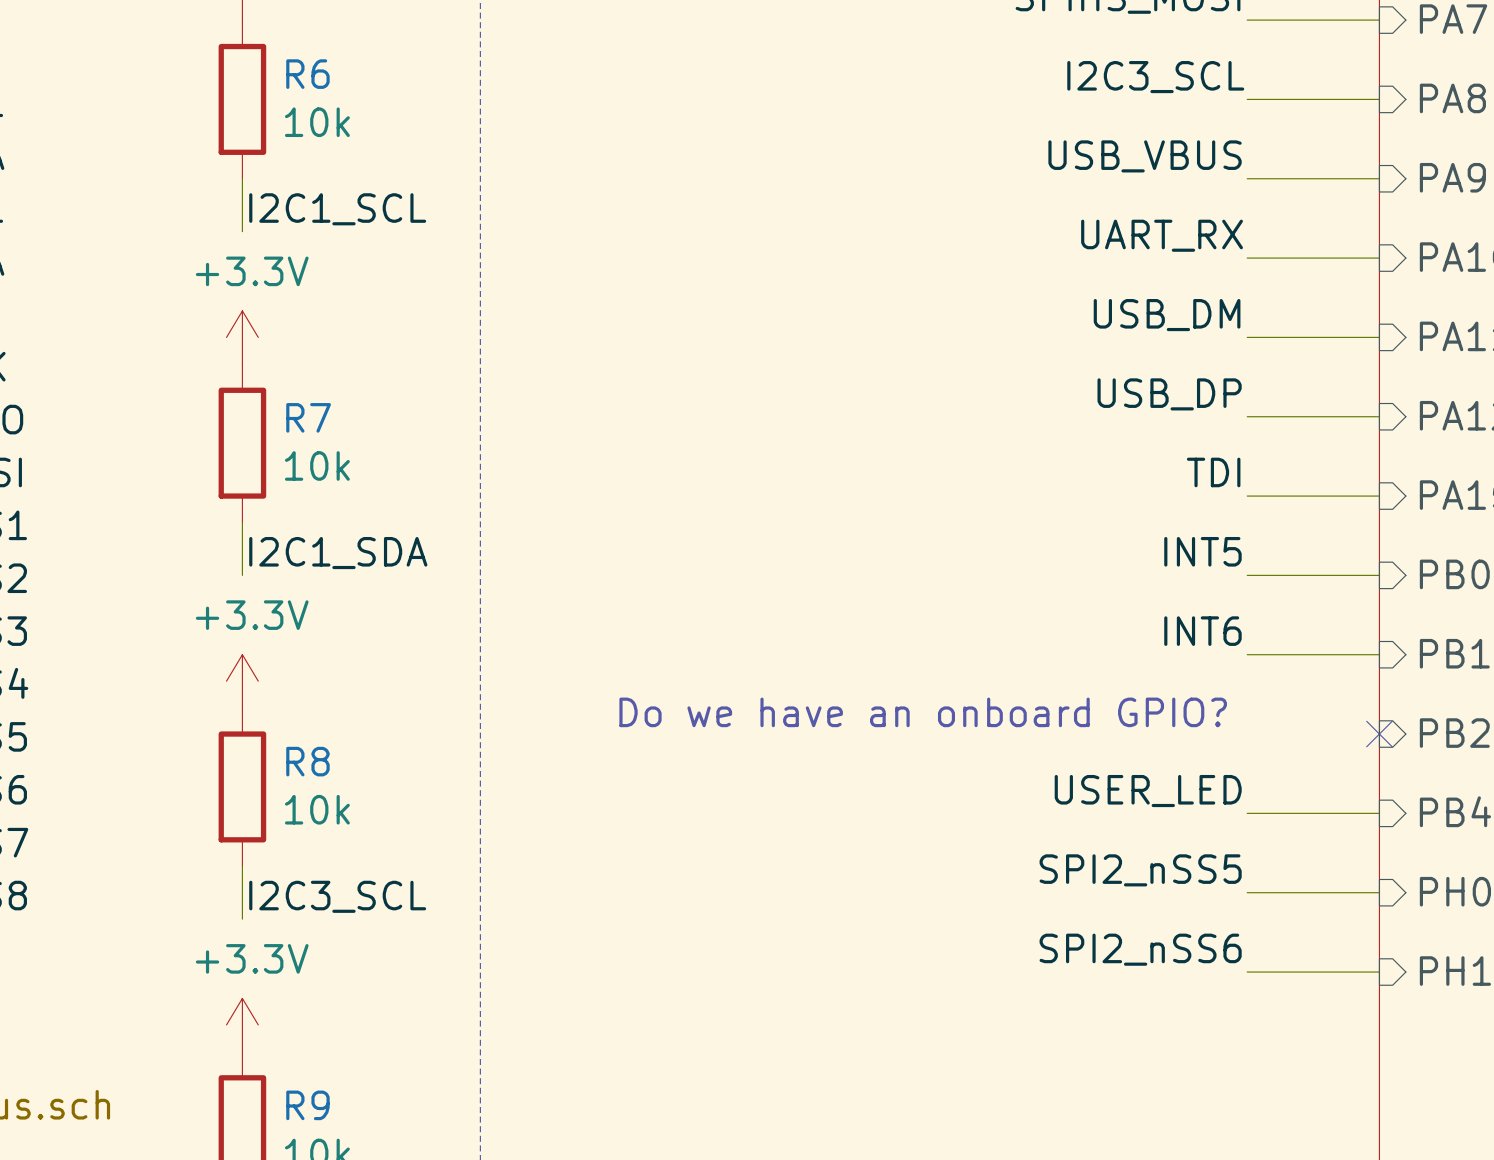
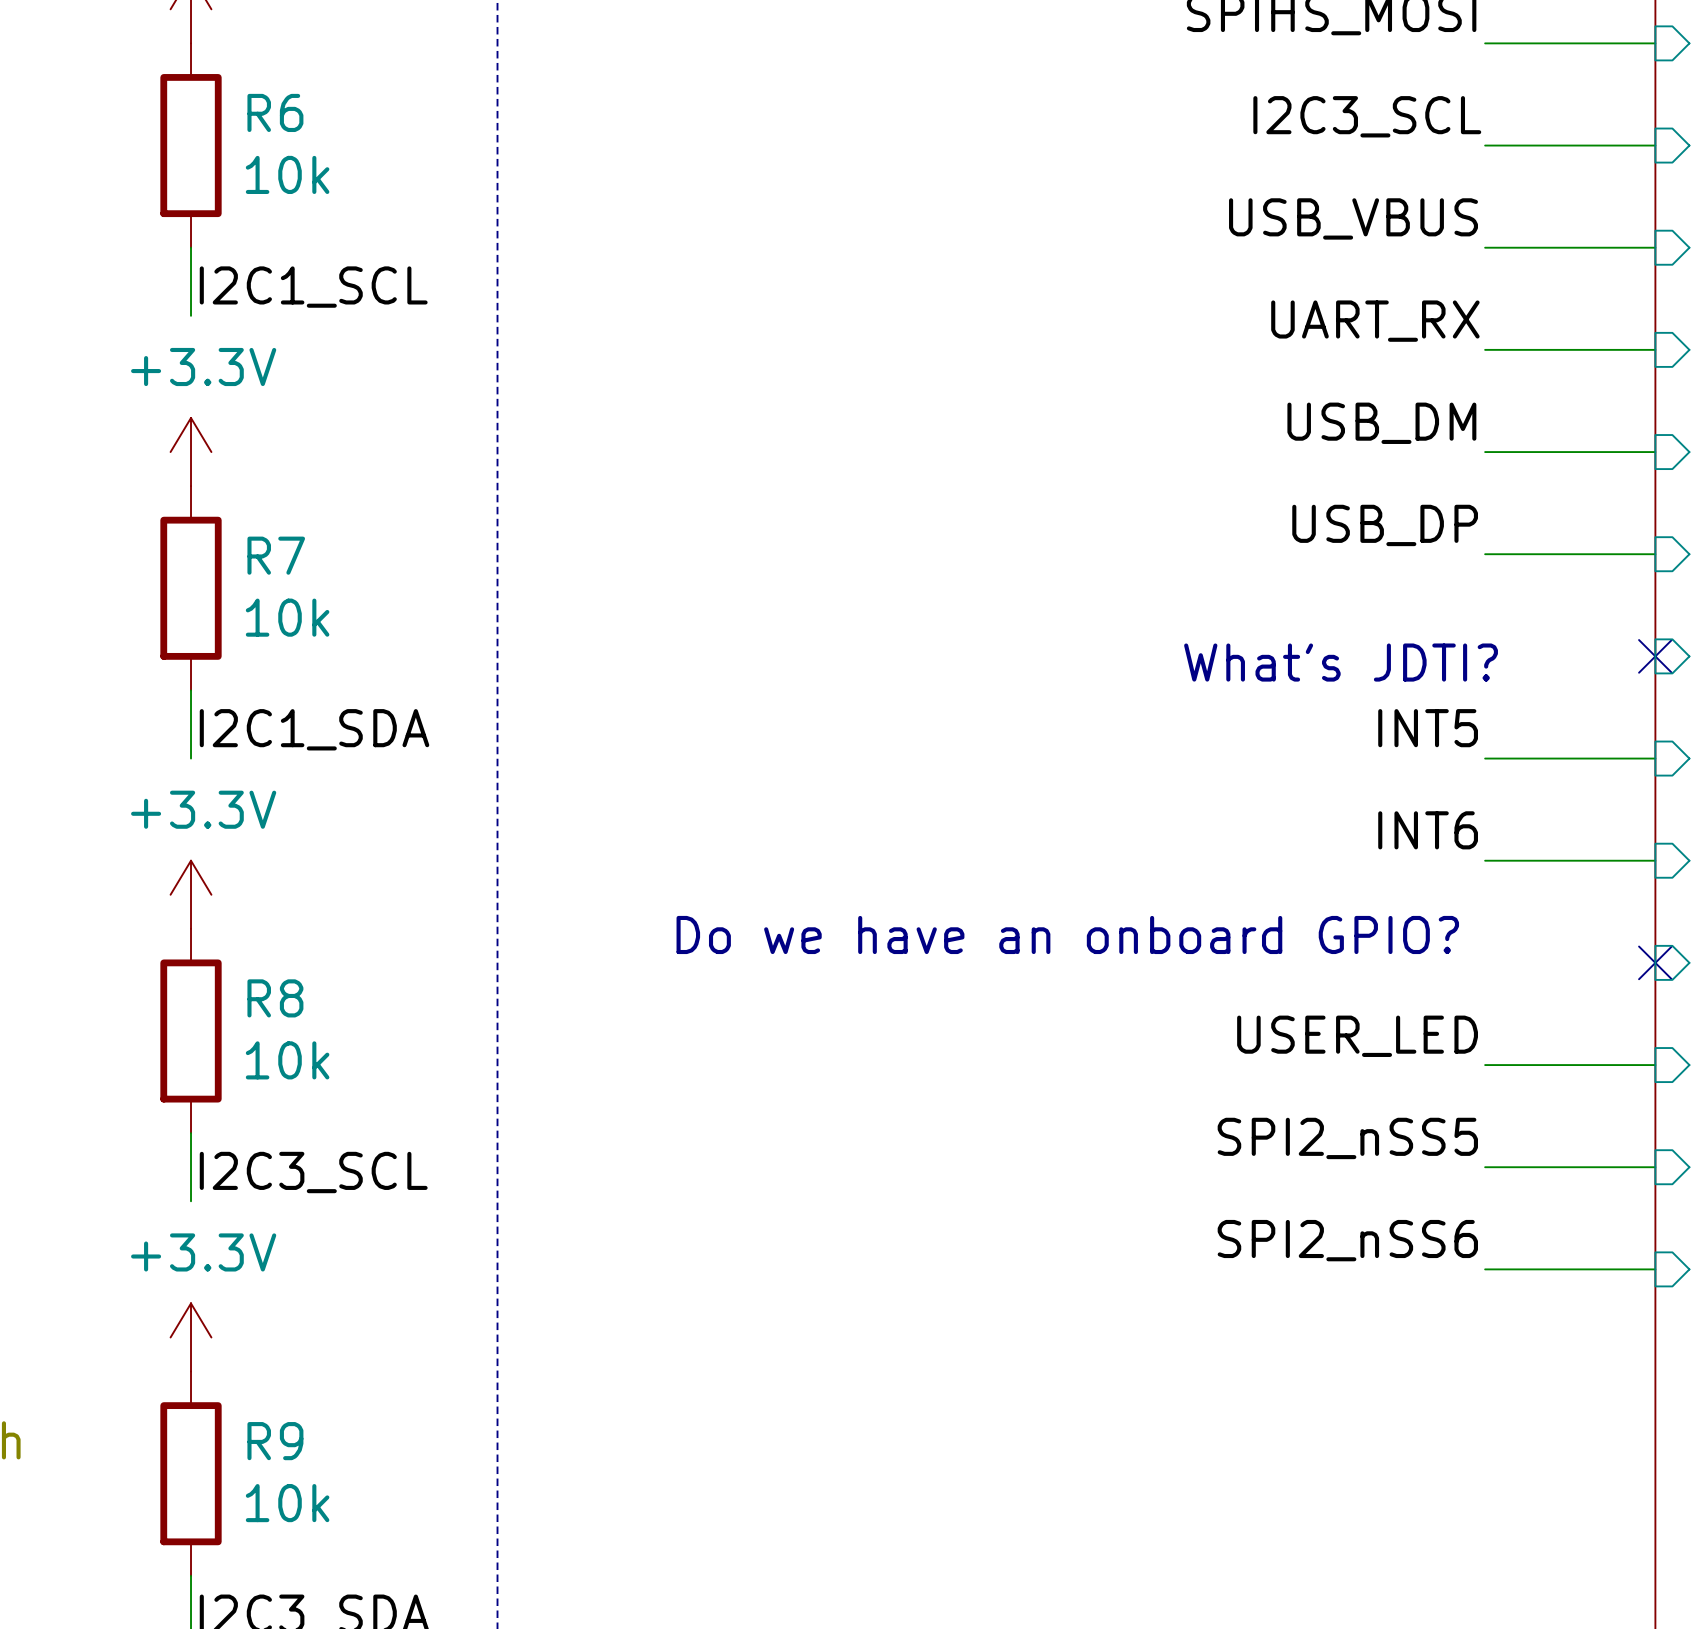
label: TDI (1213, 472) -> none
wire: (1247, 496) (1379, 496) -> none
no-connect mark: none -> (1655, 656)
text: none -> What's JDTI? (1341, 662)

